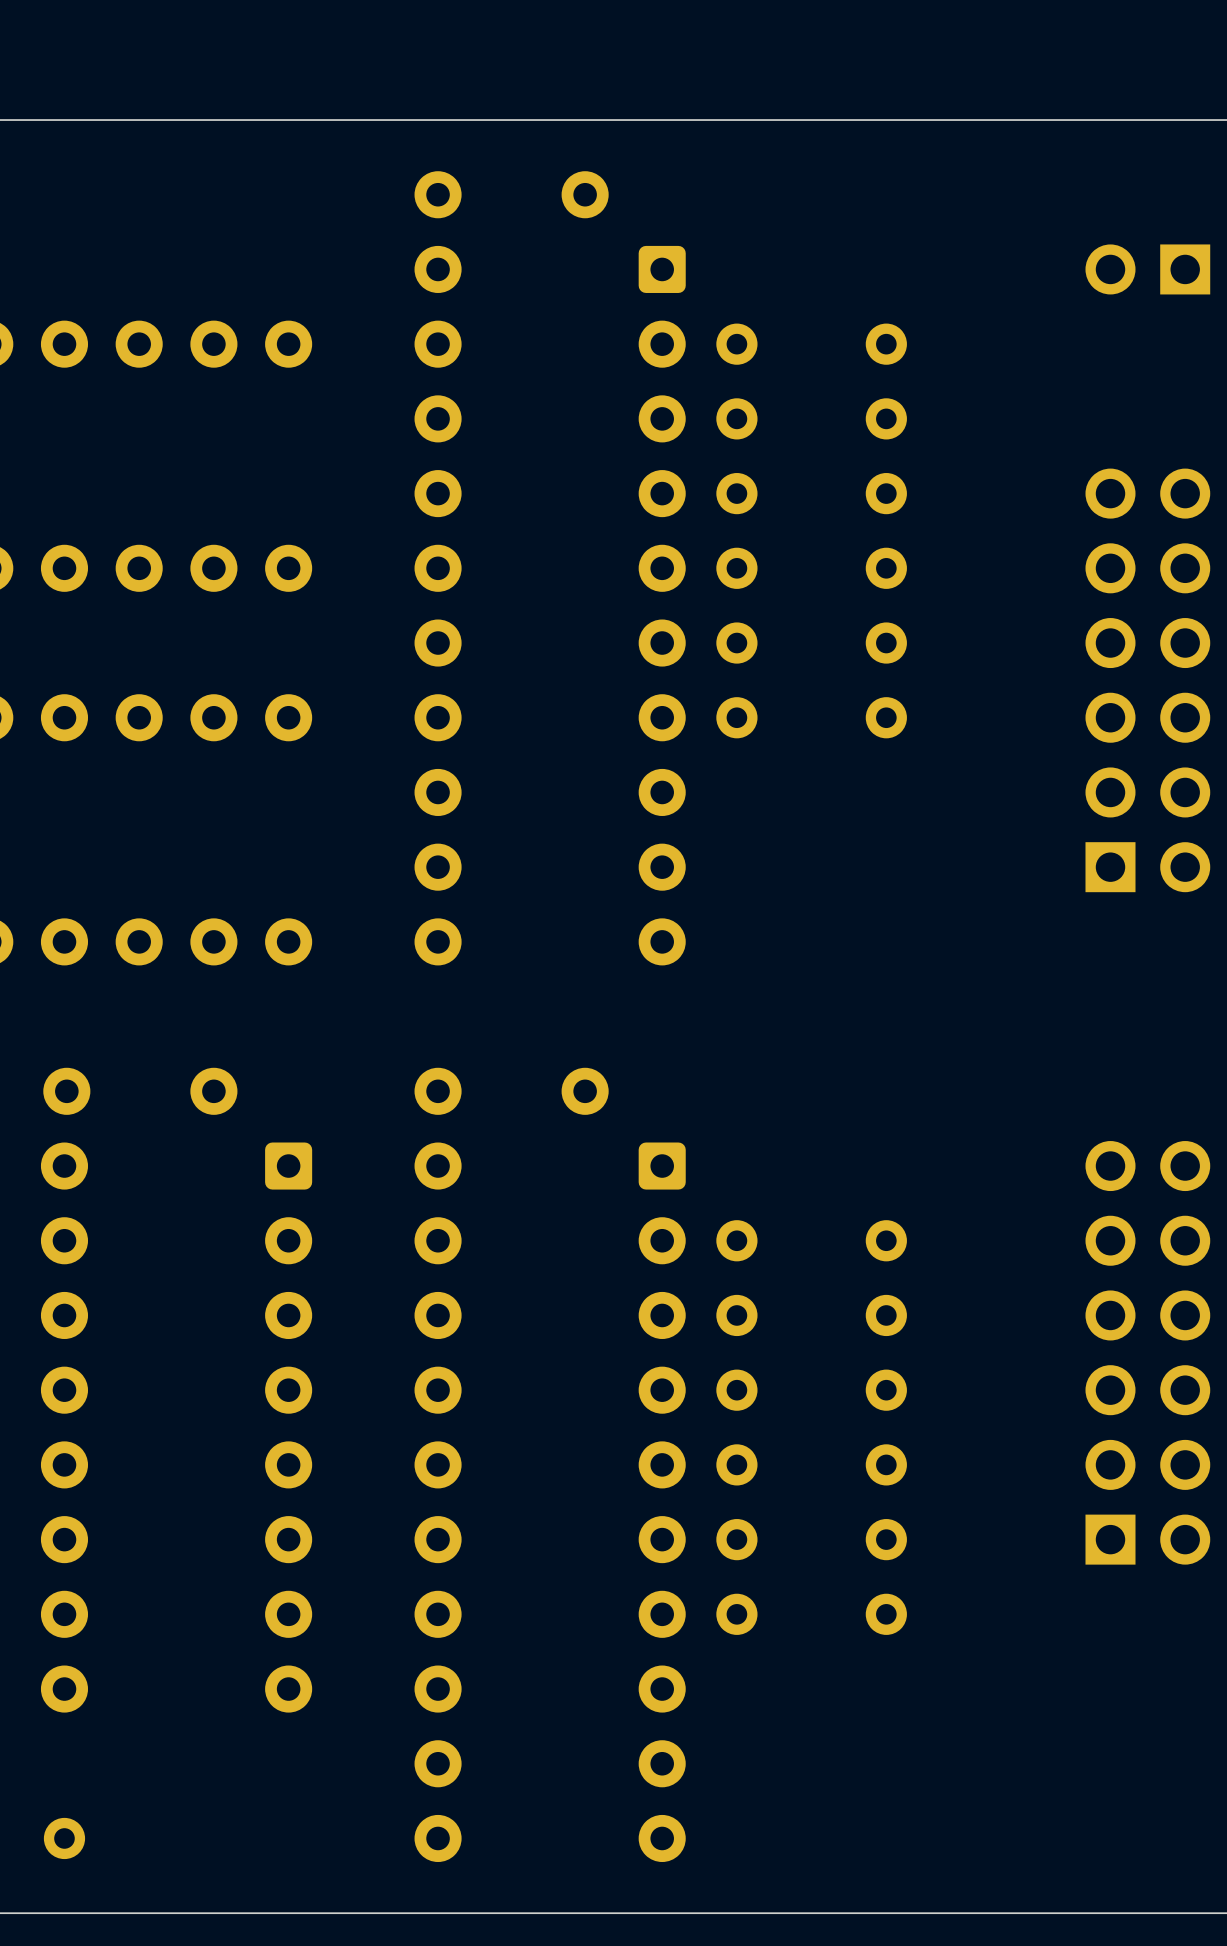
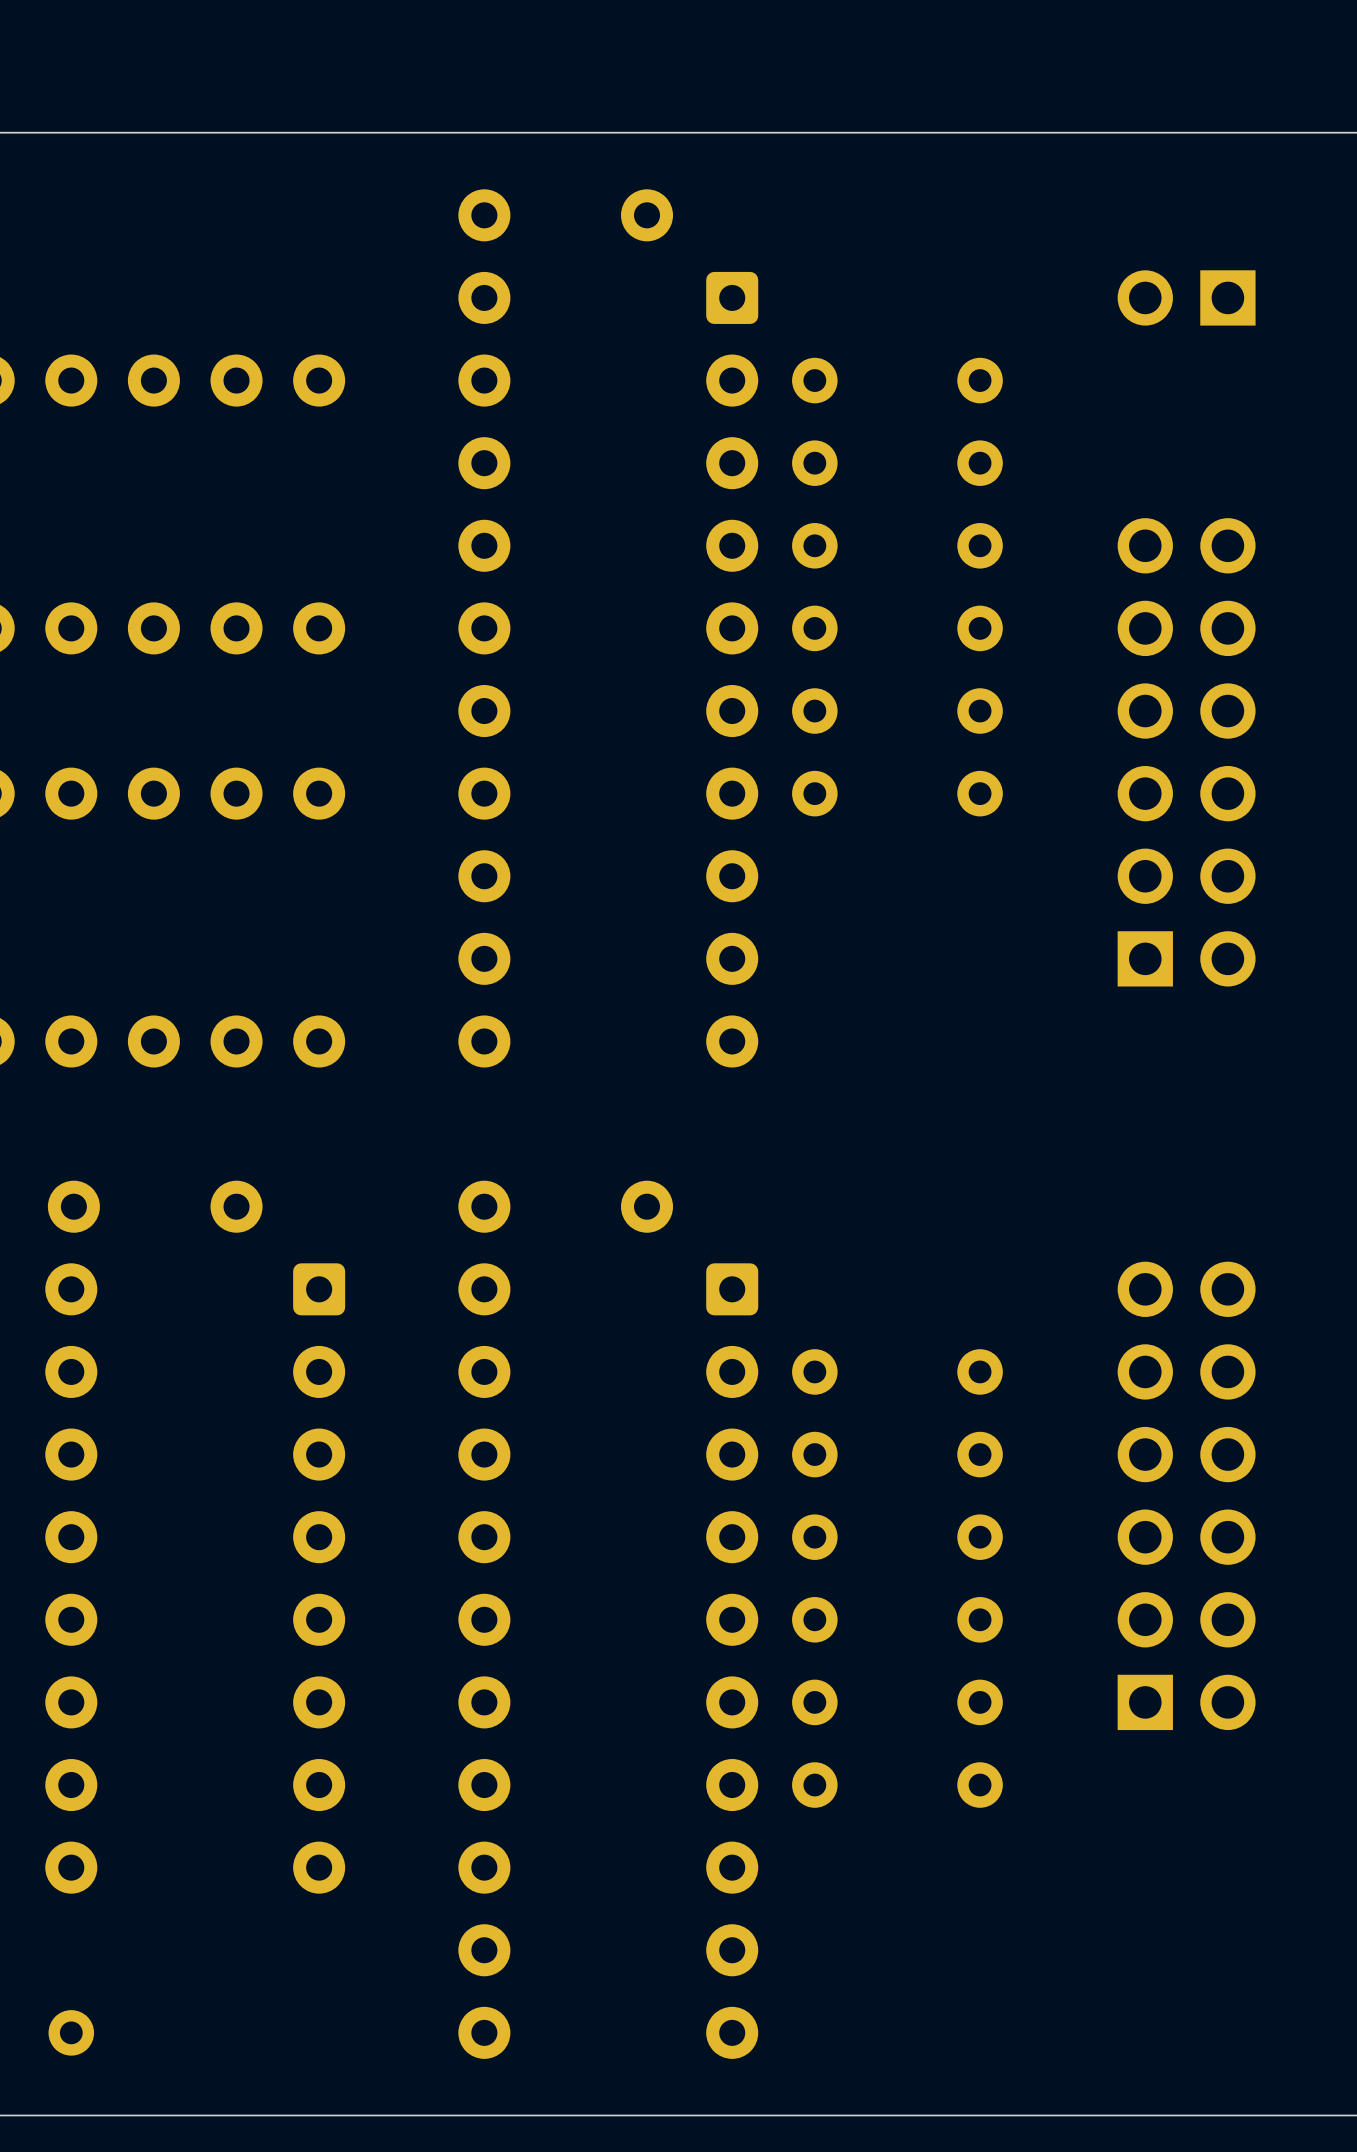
part position: (1147, 269) -> (1186, 297)
part position: (1147, 680) -> (1186, 752)
part position: (1147, 1352) -> (1186, 1495)

